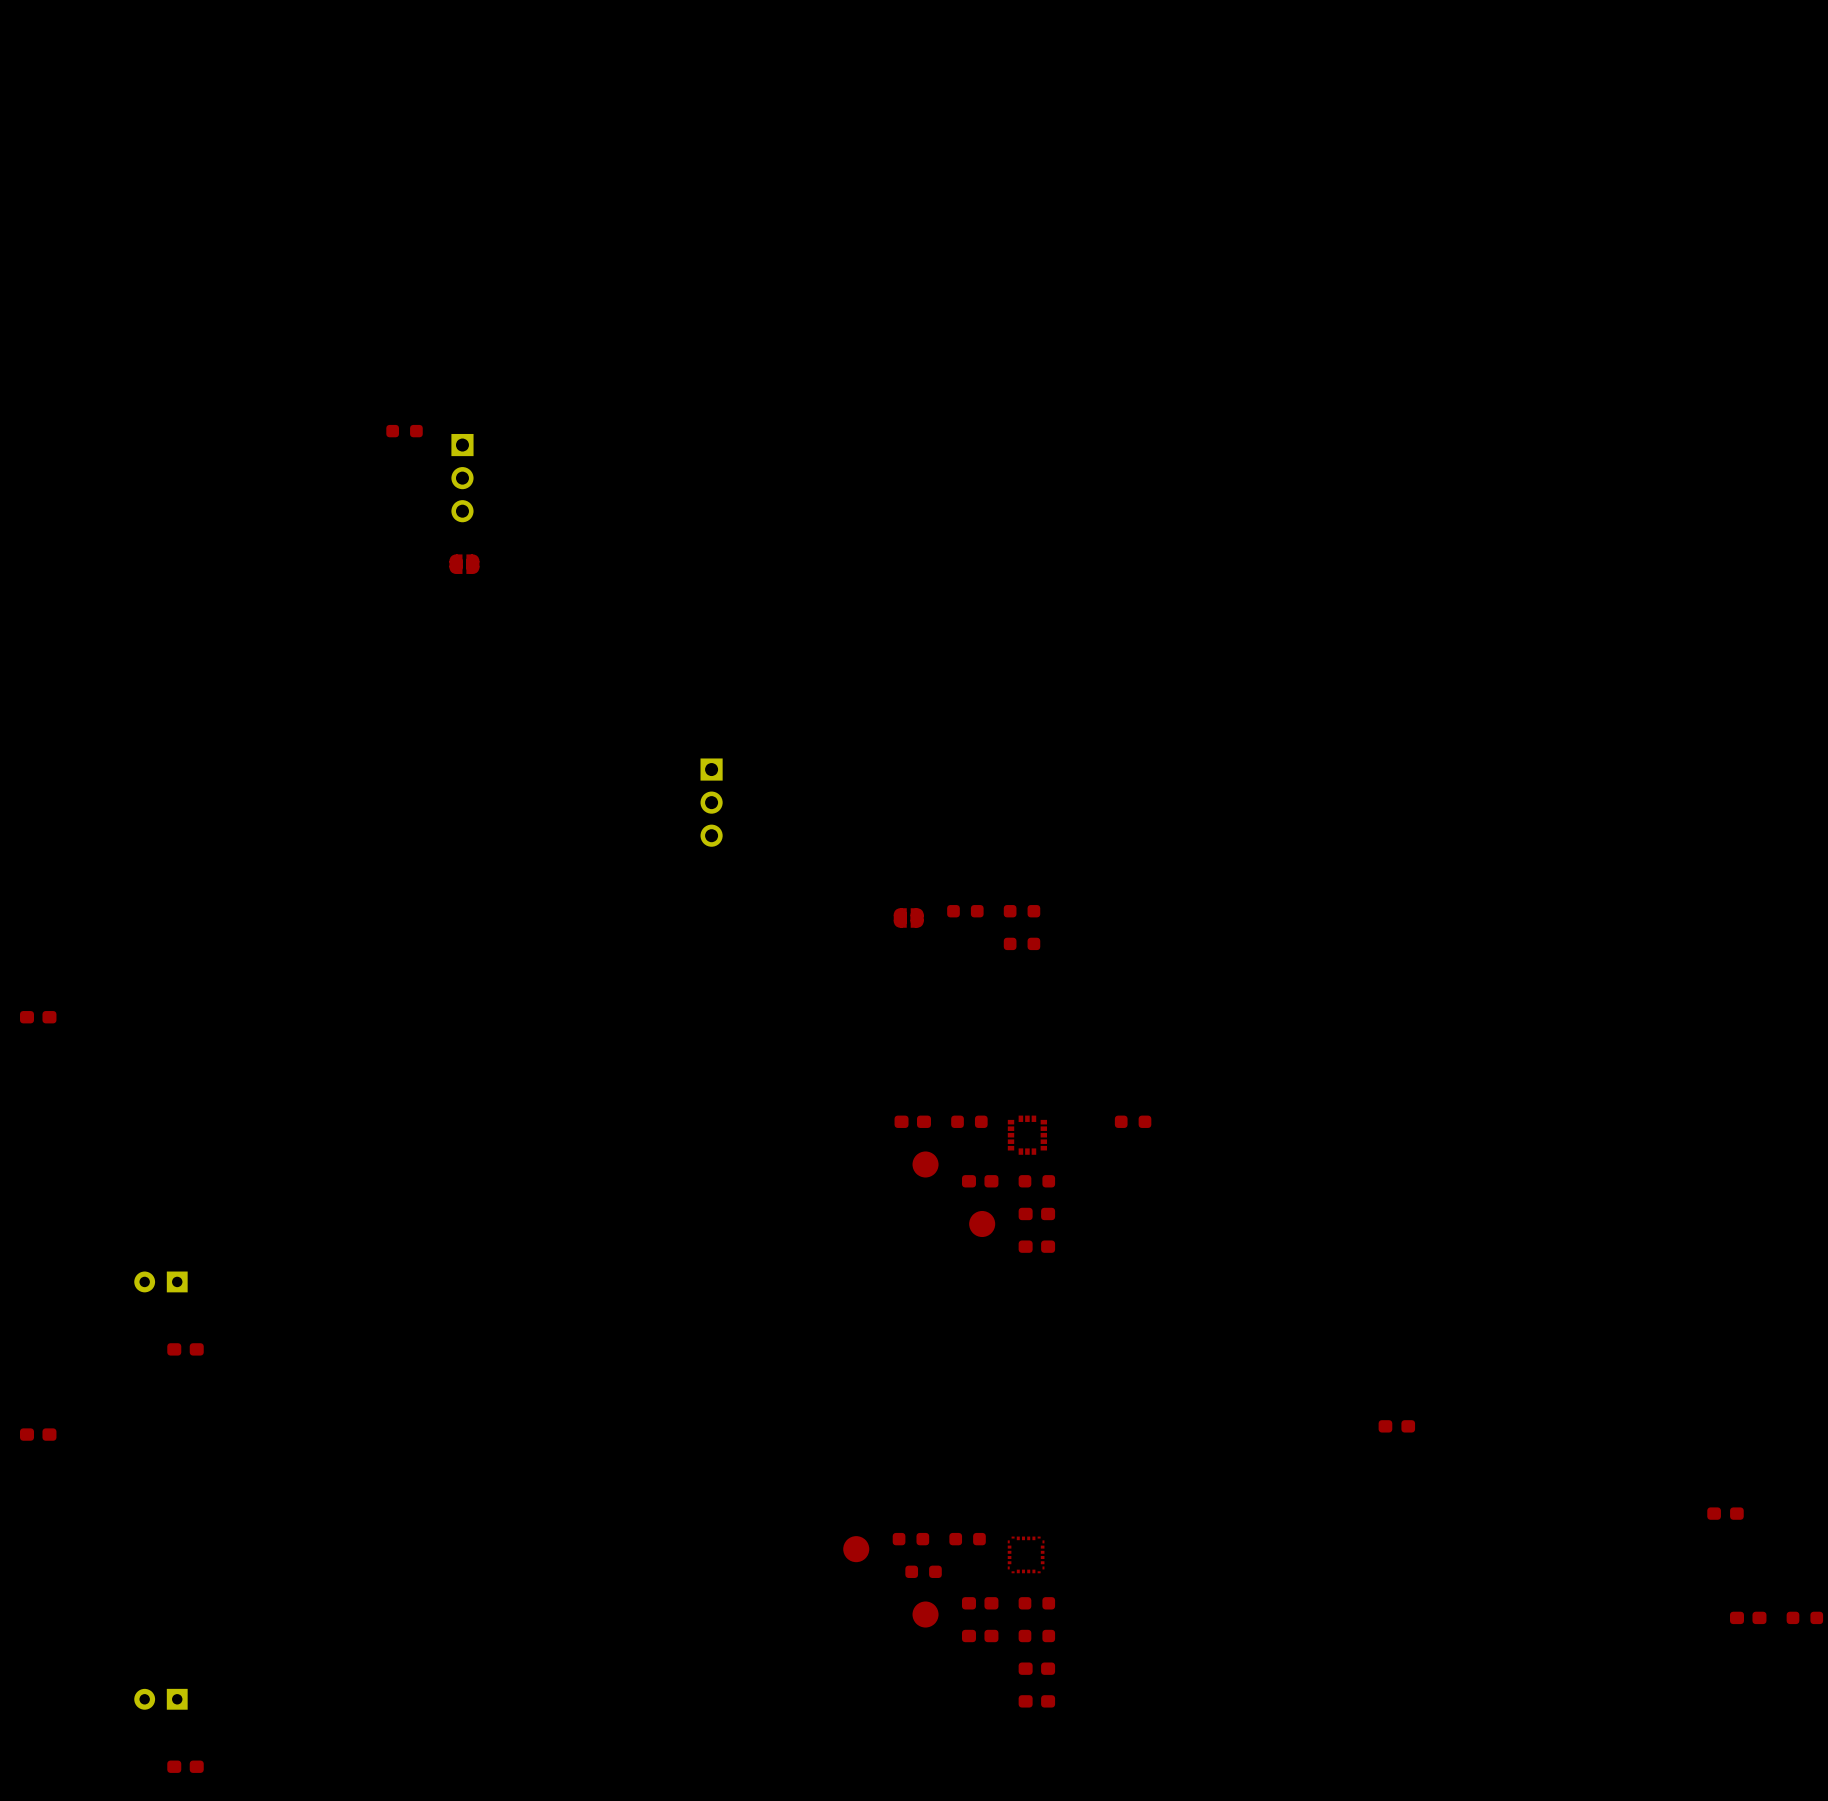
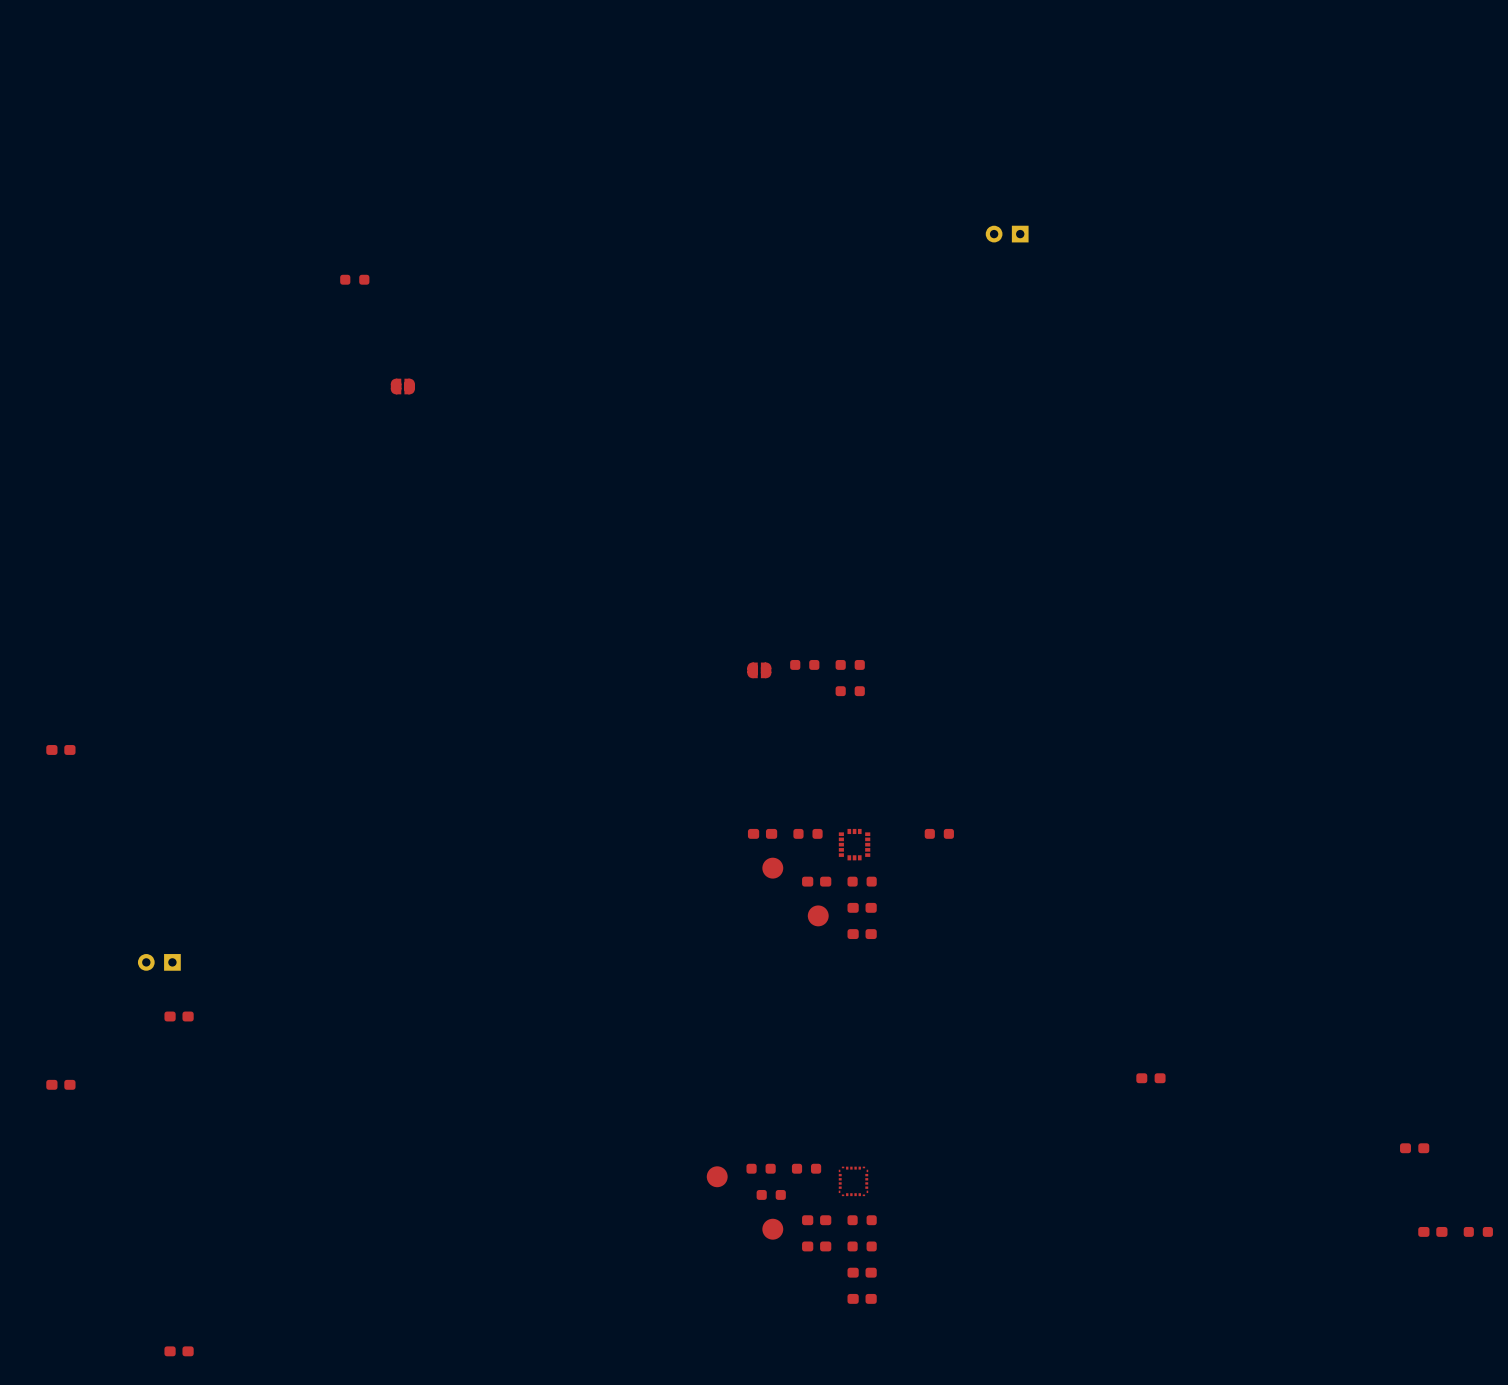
part: none -> (1007, 234)
part: (462, 478) -> none
part: (711, 802) -> none
part: (160, 1699) -> none

